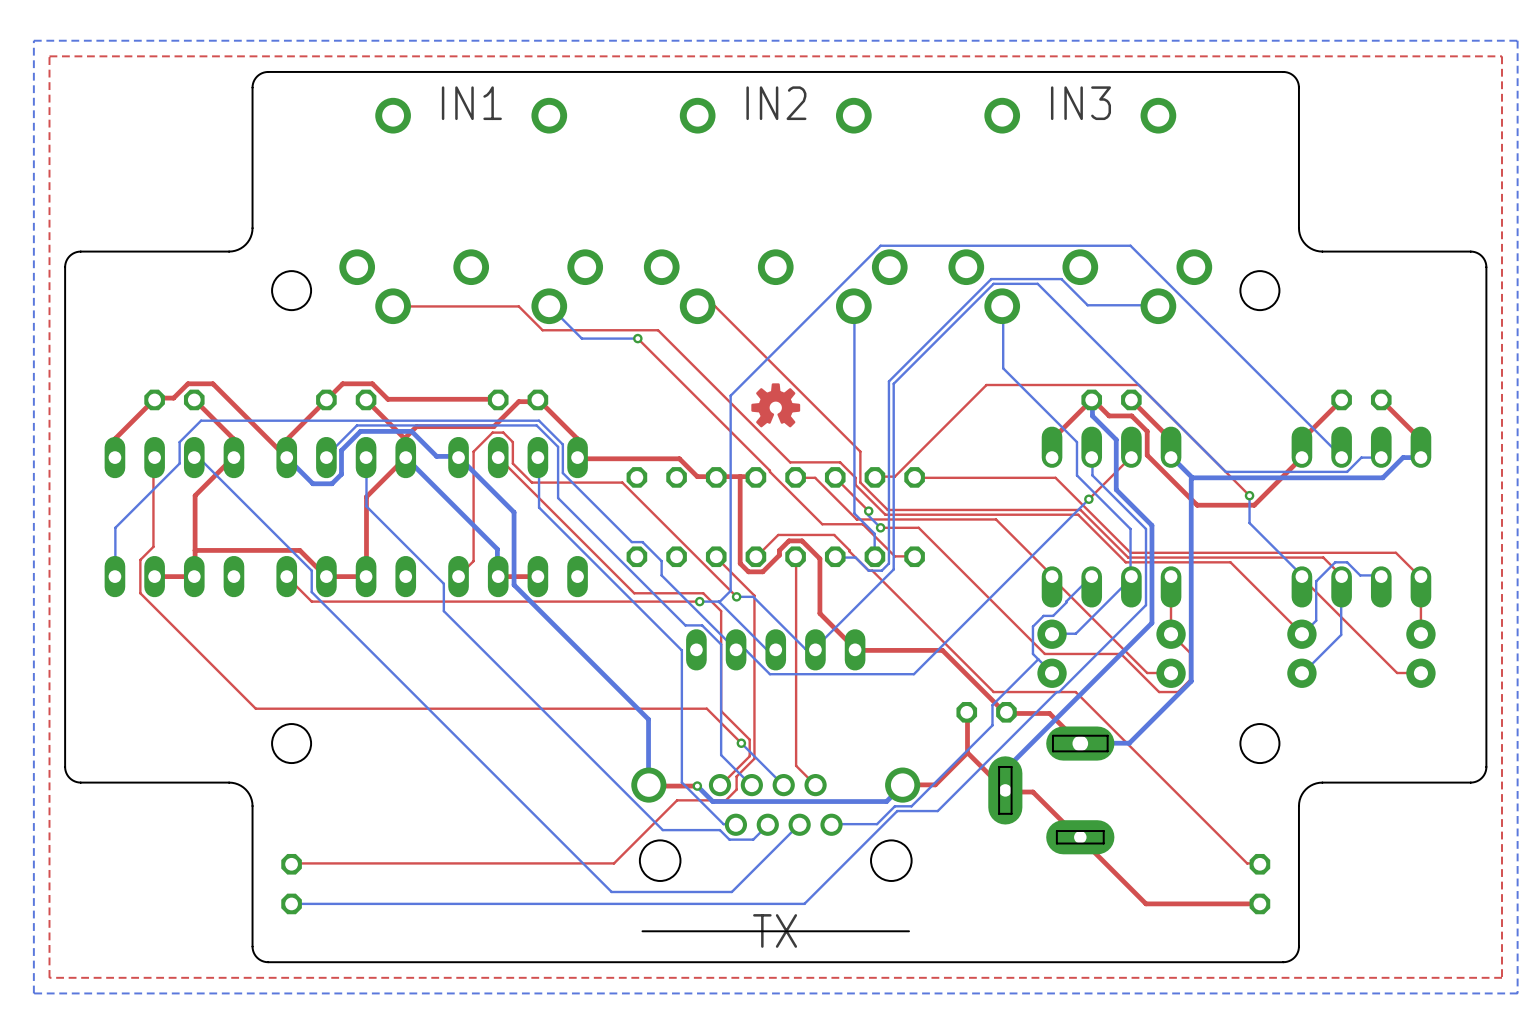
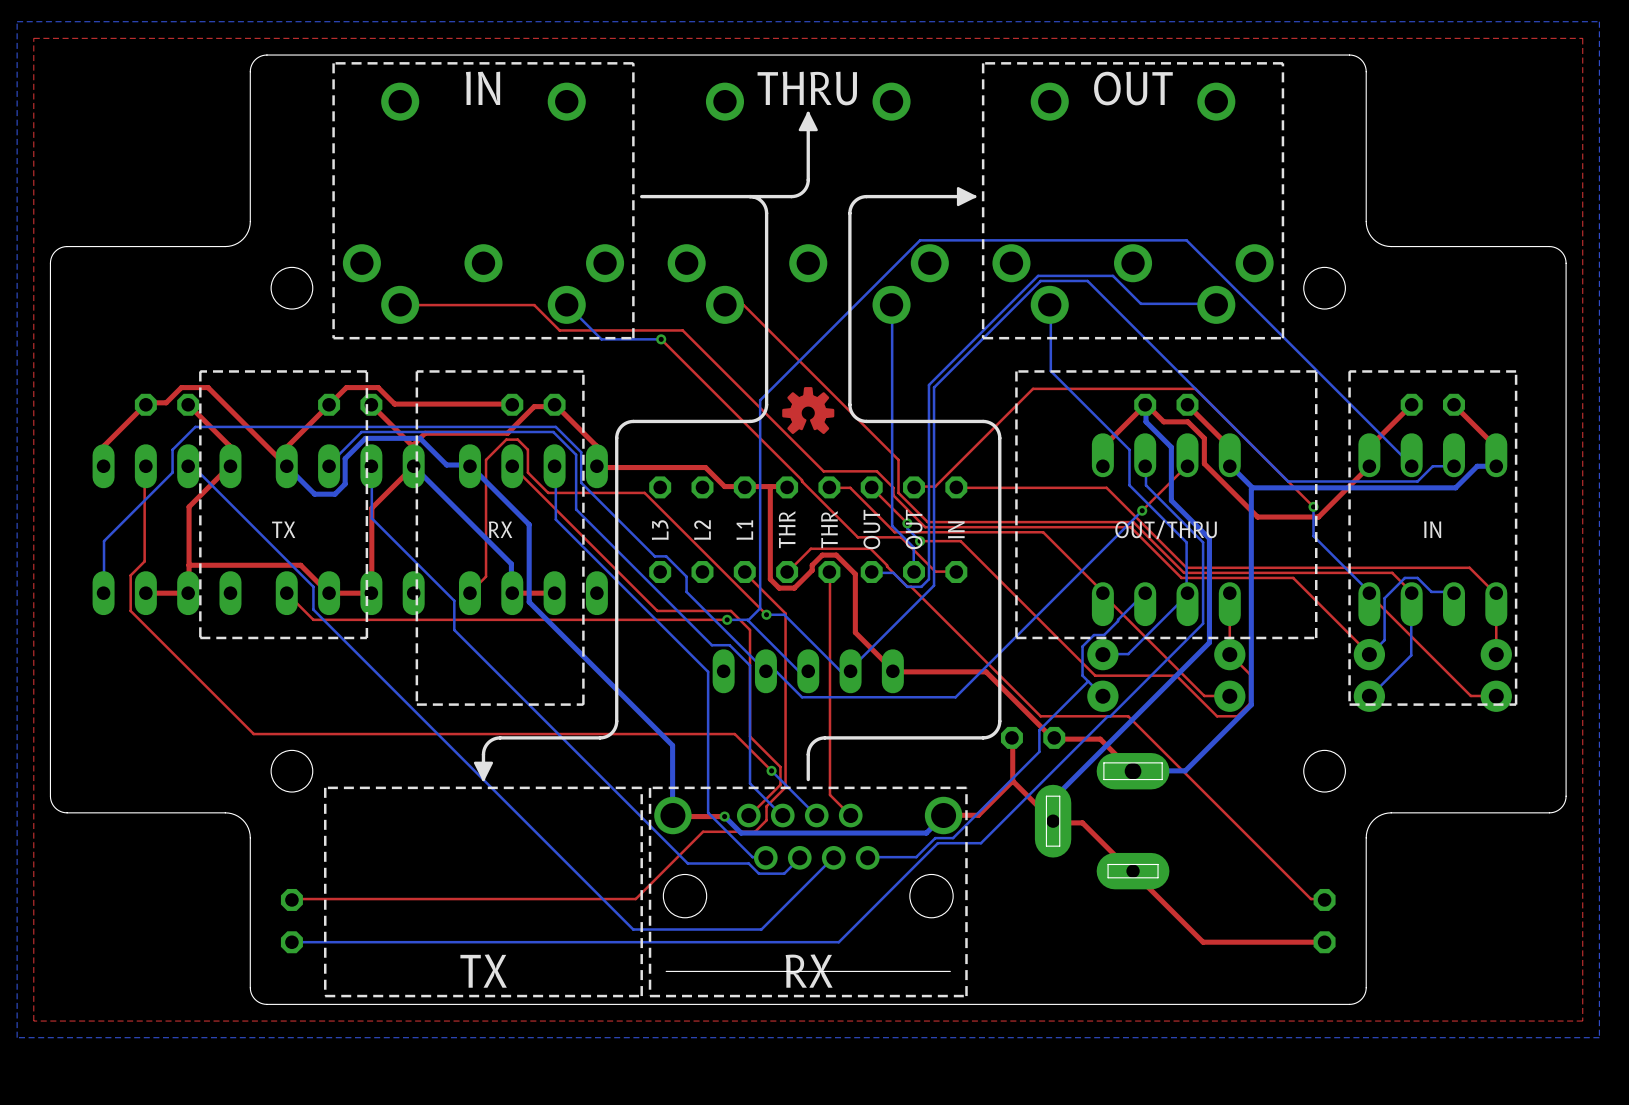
line: none -> (633, 63) (333, 63) (333, 338) (633, 338) (633, 63)
line: none -> (1282, 63) (983, 63) (983, 338) (1282, 338) (1282, 63)
text: IN1 (471, 103) -> IN (483, 88)
text: IN2 (776, 103) -> THRU (807, 88)
text: IN3 (1080, 103) -> OUT (1133, 88)
drawing: none -> [798, 112, 818, 132]
line: none -> (808, 113) (808, 182) (804, 190) (799, 194) (791, 196) (641, 196)
drawing: none -> [956, 187, 977, 207]
line: none -> (749, 196) (760, 200) (766, 211) (765, 411) (760, 418) (752, 421) (633, 421) (627, 422) (620, 427) (616, 438) (615, 727) (610, 734) (602, 737) (493, 739) (486, 744) (484, 750) (483, 779)
line: none -> (974, 196) (864, 196) (856, 200) (852, 204) (849, 213) (849, 404) (853, 414) (864, 421) (985, 421) (993, 424) (998, 431) (999, 725) (993, 734) (985, 737) (820, 738) (813, 742) (808, 750) (808, 779)
line: none -> (366, 371) (200, 371) (200, 637) (366, 637) (366, 371)
line: none -> (583, 371) (416, 371) (416, 704) (583, 704) (583, 371)
line: none -> (1316, 371) (1016, 371) (1016, 637) (1316, 637) (1316, 371)
line: none -> (1516, 371) (1349, 371) (1349, 704) (1516, 704) (1516, 371)
text: none -> L3 (660, 530)
text: none -> L2 (702, 530)
text: none -> L1 (744, 530)
text: none -> OUT (871, 529)
text: none -> OUT (914, 529)
text: none -> TX (283, 529)
text: none -> RX (500, 529)
text: none -> THR (787, 529)
text: none -> THR (829, 529)
text: none -> IN (956, 529)
text: none -> IN (1432, 529)
text: none -> OUT/THRU (1166, 529)
drawing: none -> [473, 761, 494, 781]
line: none -> (641, 787) (325, 787) (325, 996) (641, 996) (641, 787)
line: none -> (966, 787) (650, 787) (650, 996) (966, 996) (966, 787)
text: none -> TX (483, 971)
text: TX (775, 930) -> RX (809, 971)

